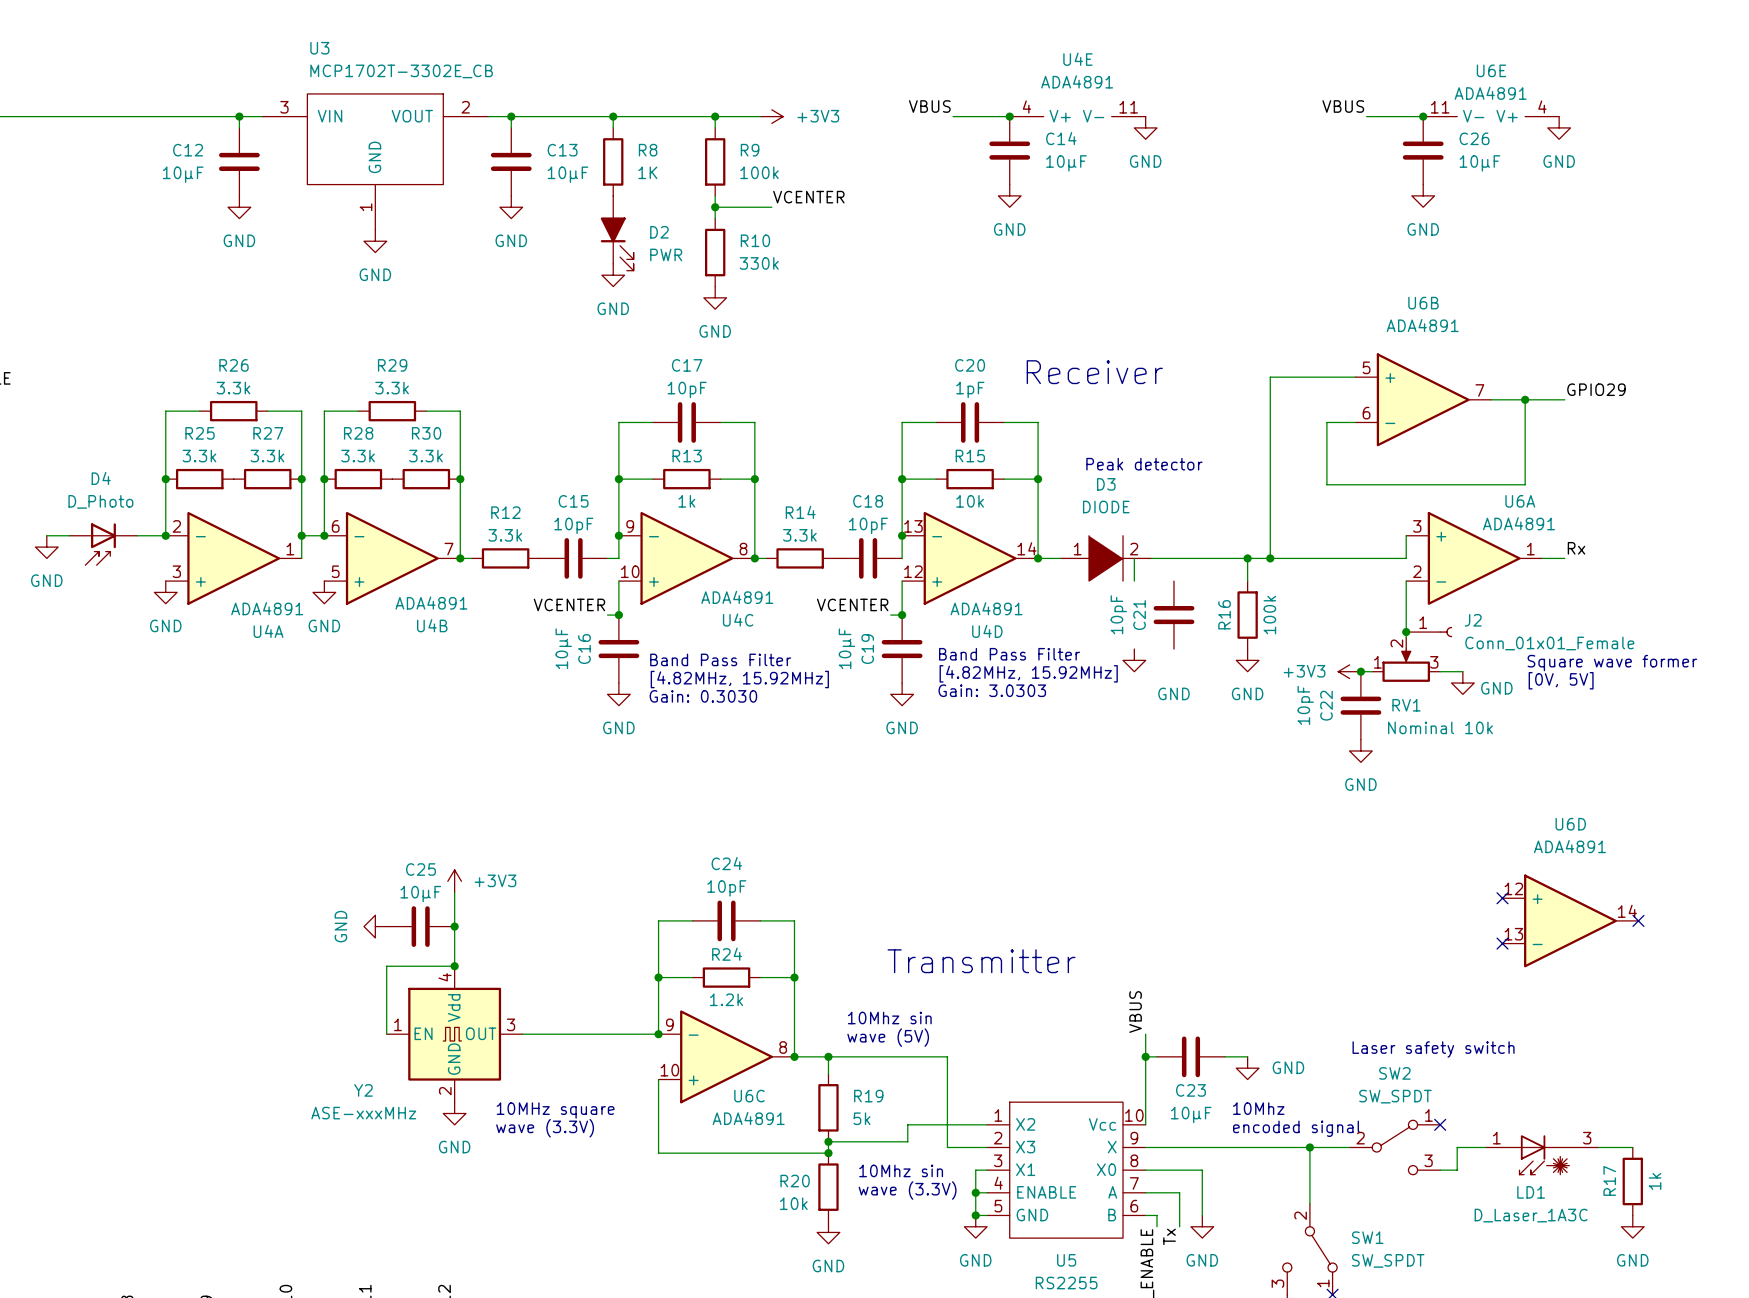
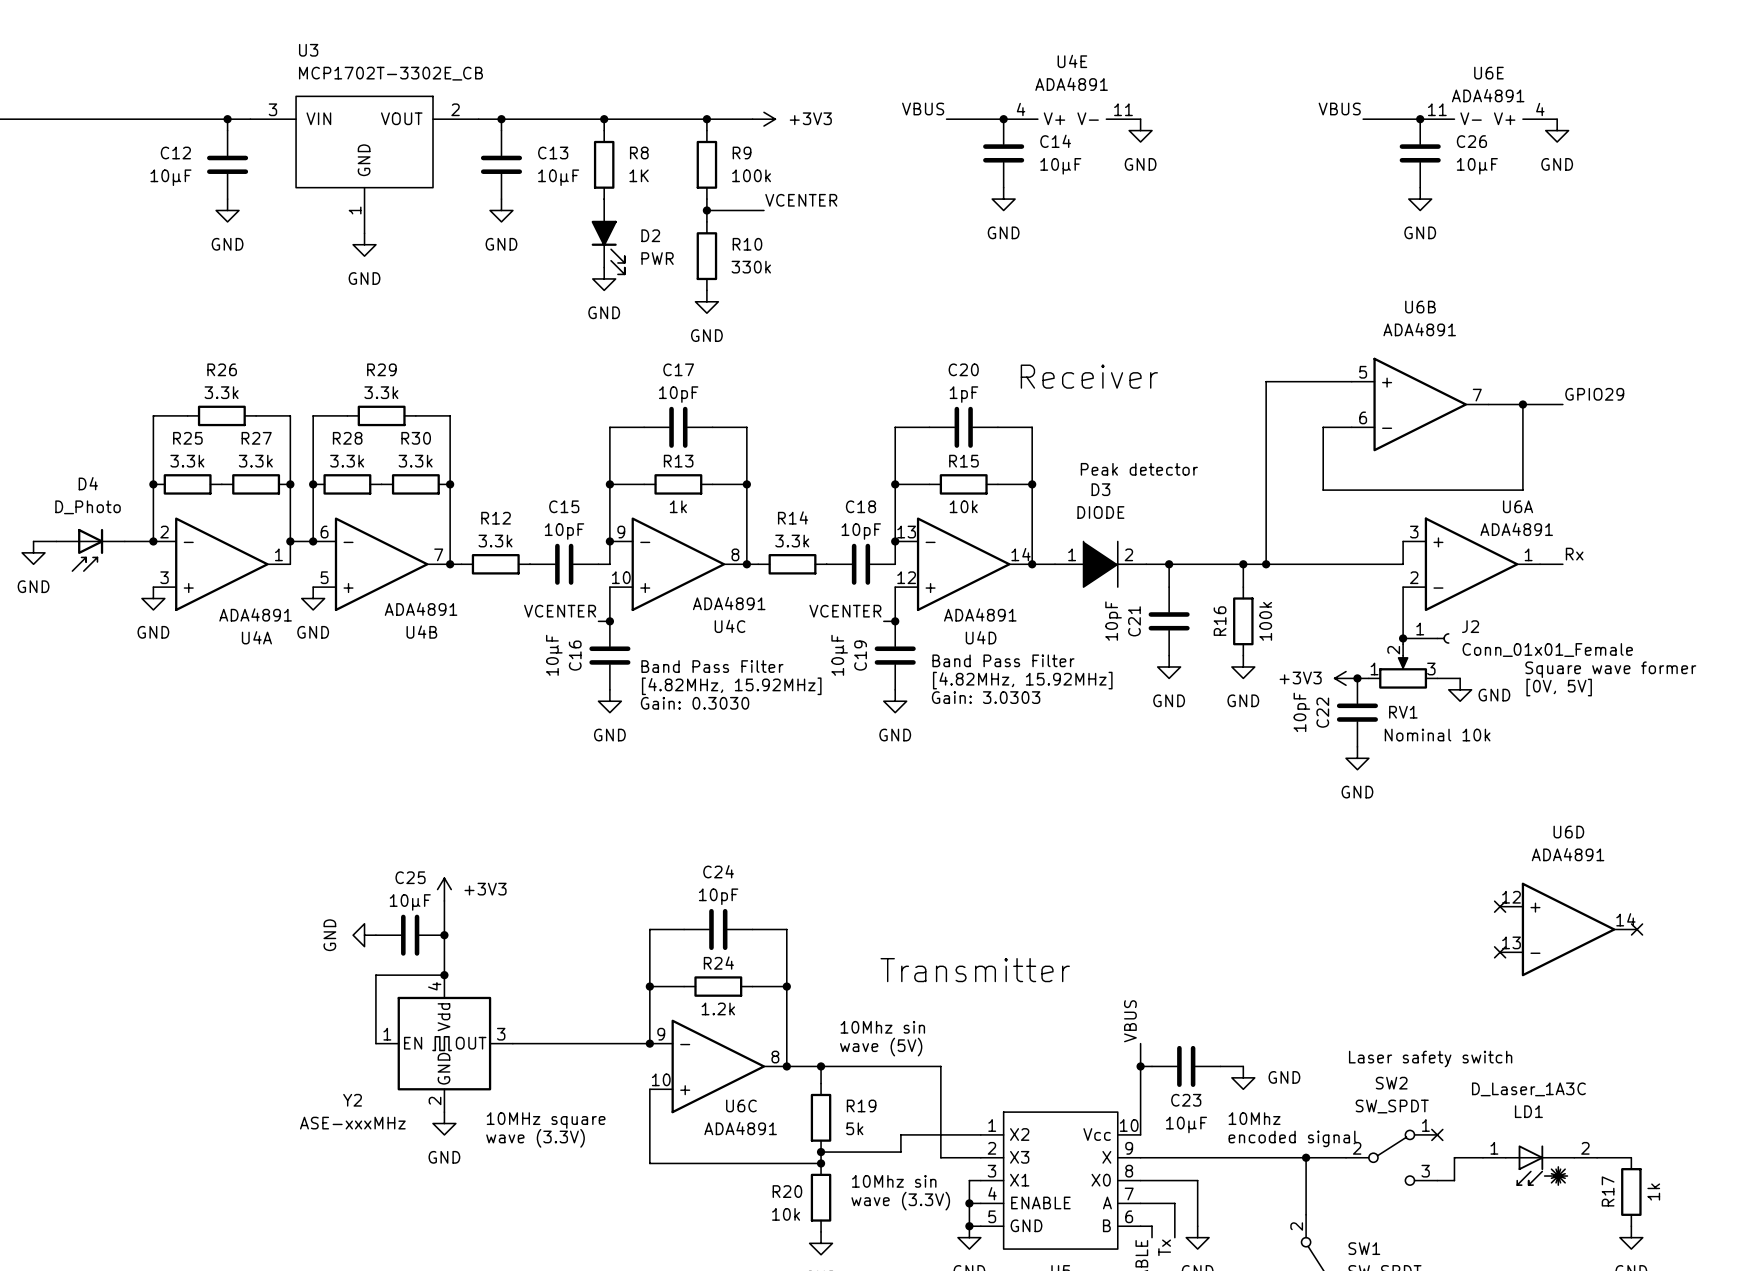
wire: (1134, 558) (1134, 581) -> (1169, 564) (1169, 587)
junction: none -> (1169, 564)
power symbol position: GND (1134, 660) -> GND (1169, 667)
LD1 pin number: 3 (1587, 1138) -> 2 (1585, 1148)
LD1 name position: LD1 (1531, 1192) -> LD1 (1528, 1111)
LD1 value position: D_Laser_1A3C (1531, 1215) -> D_Laser_1A3C (1528, 1089)

